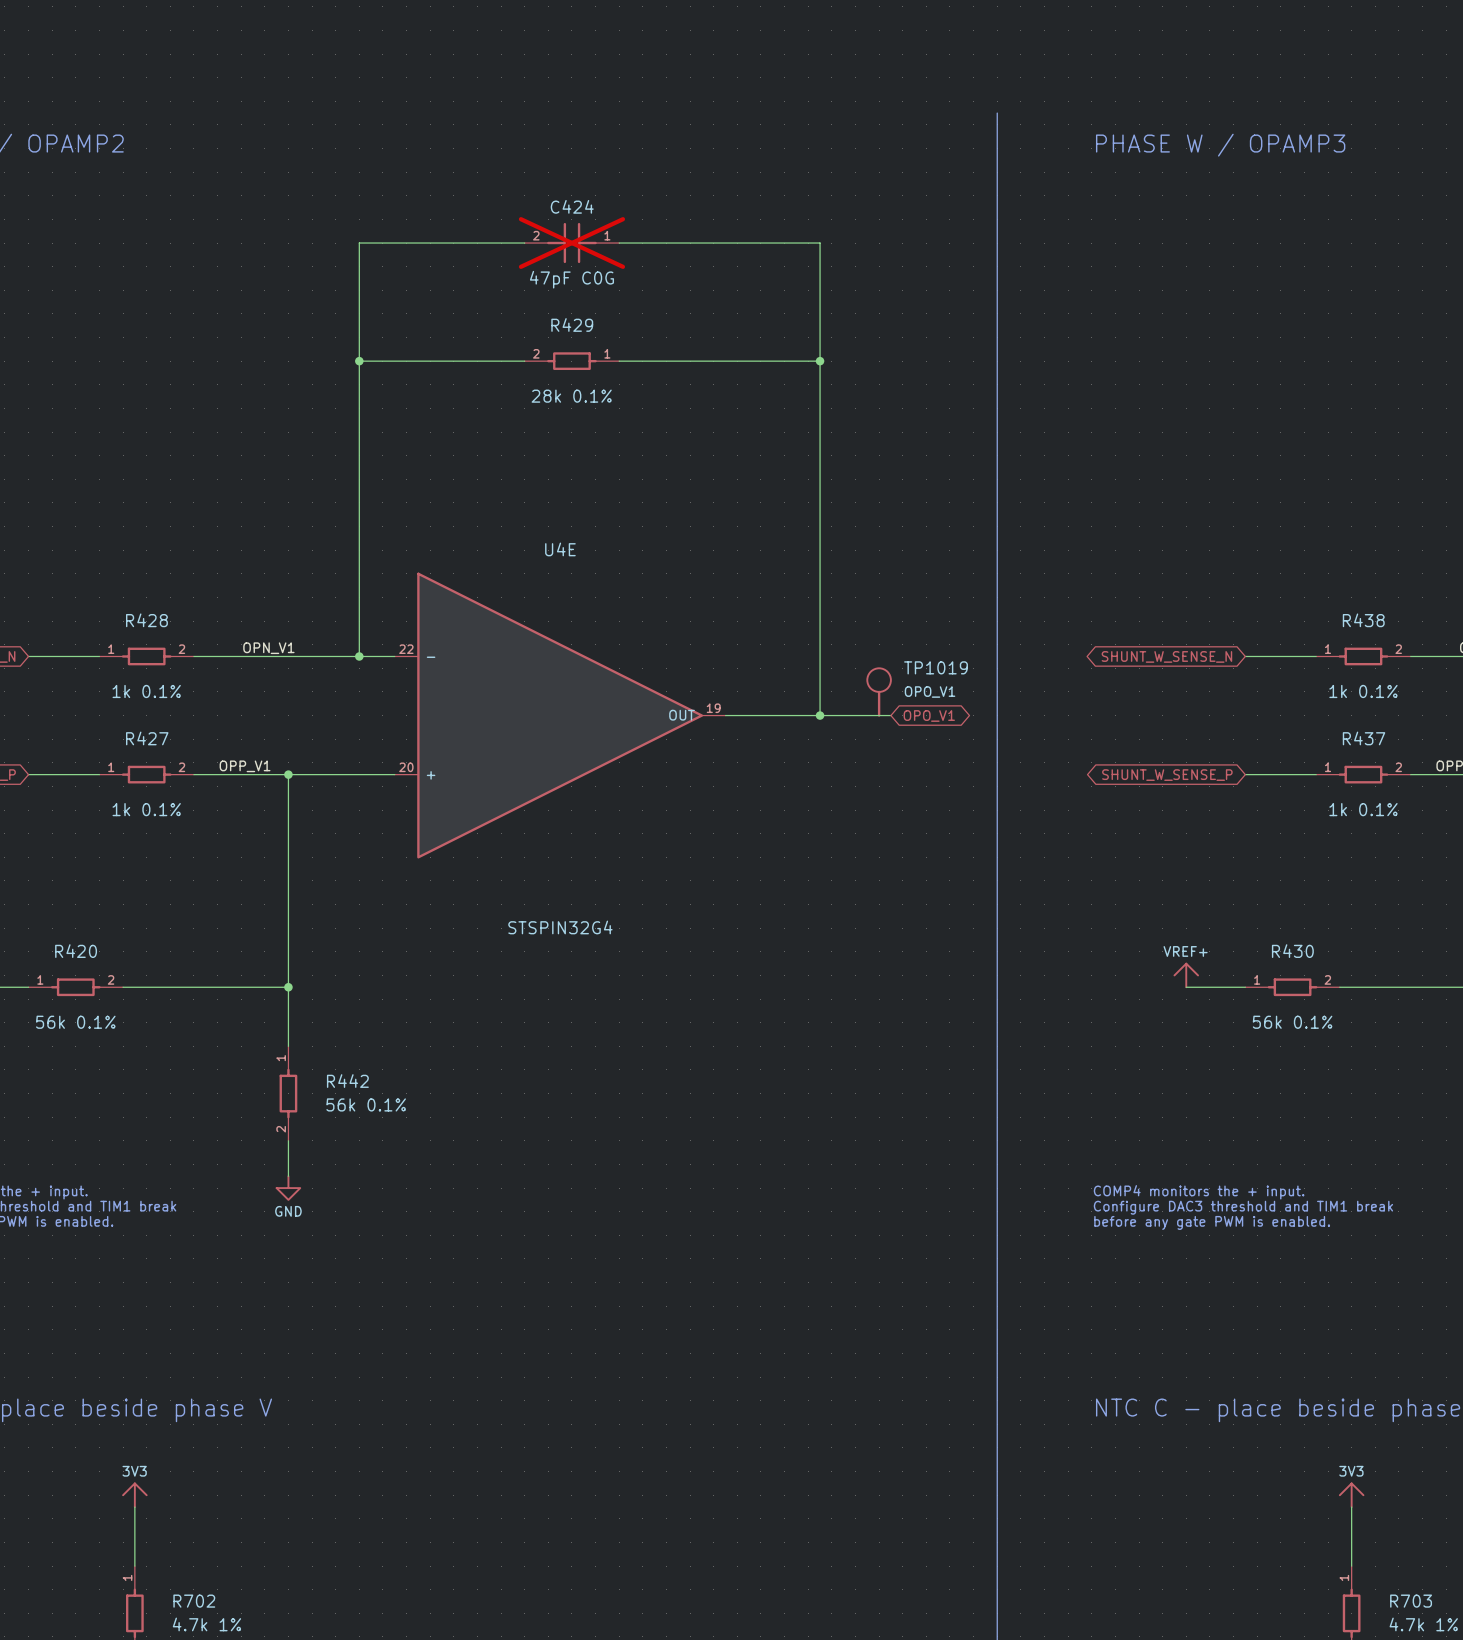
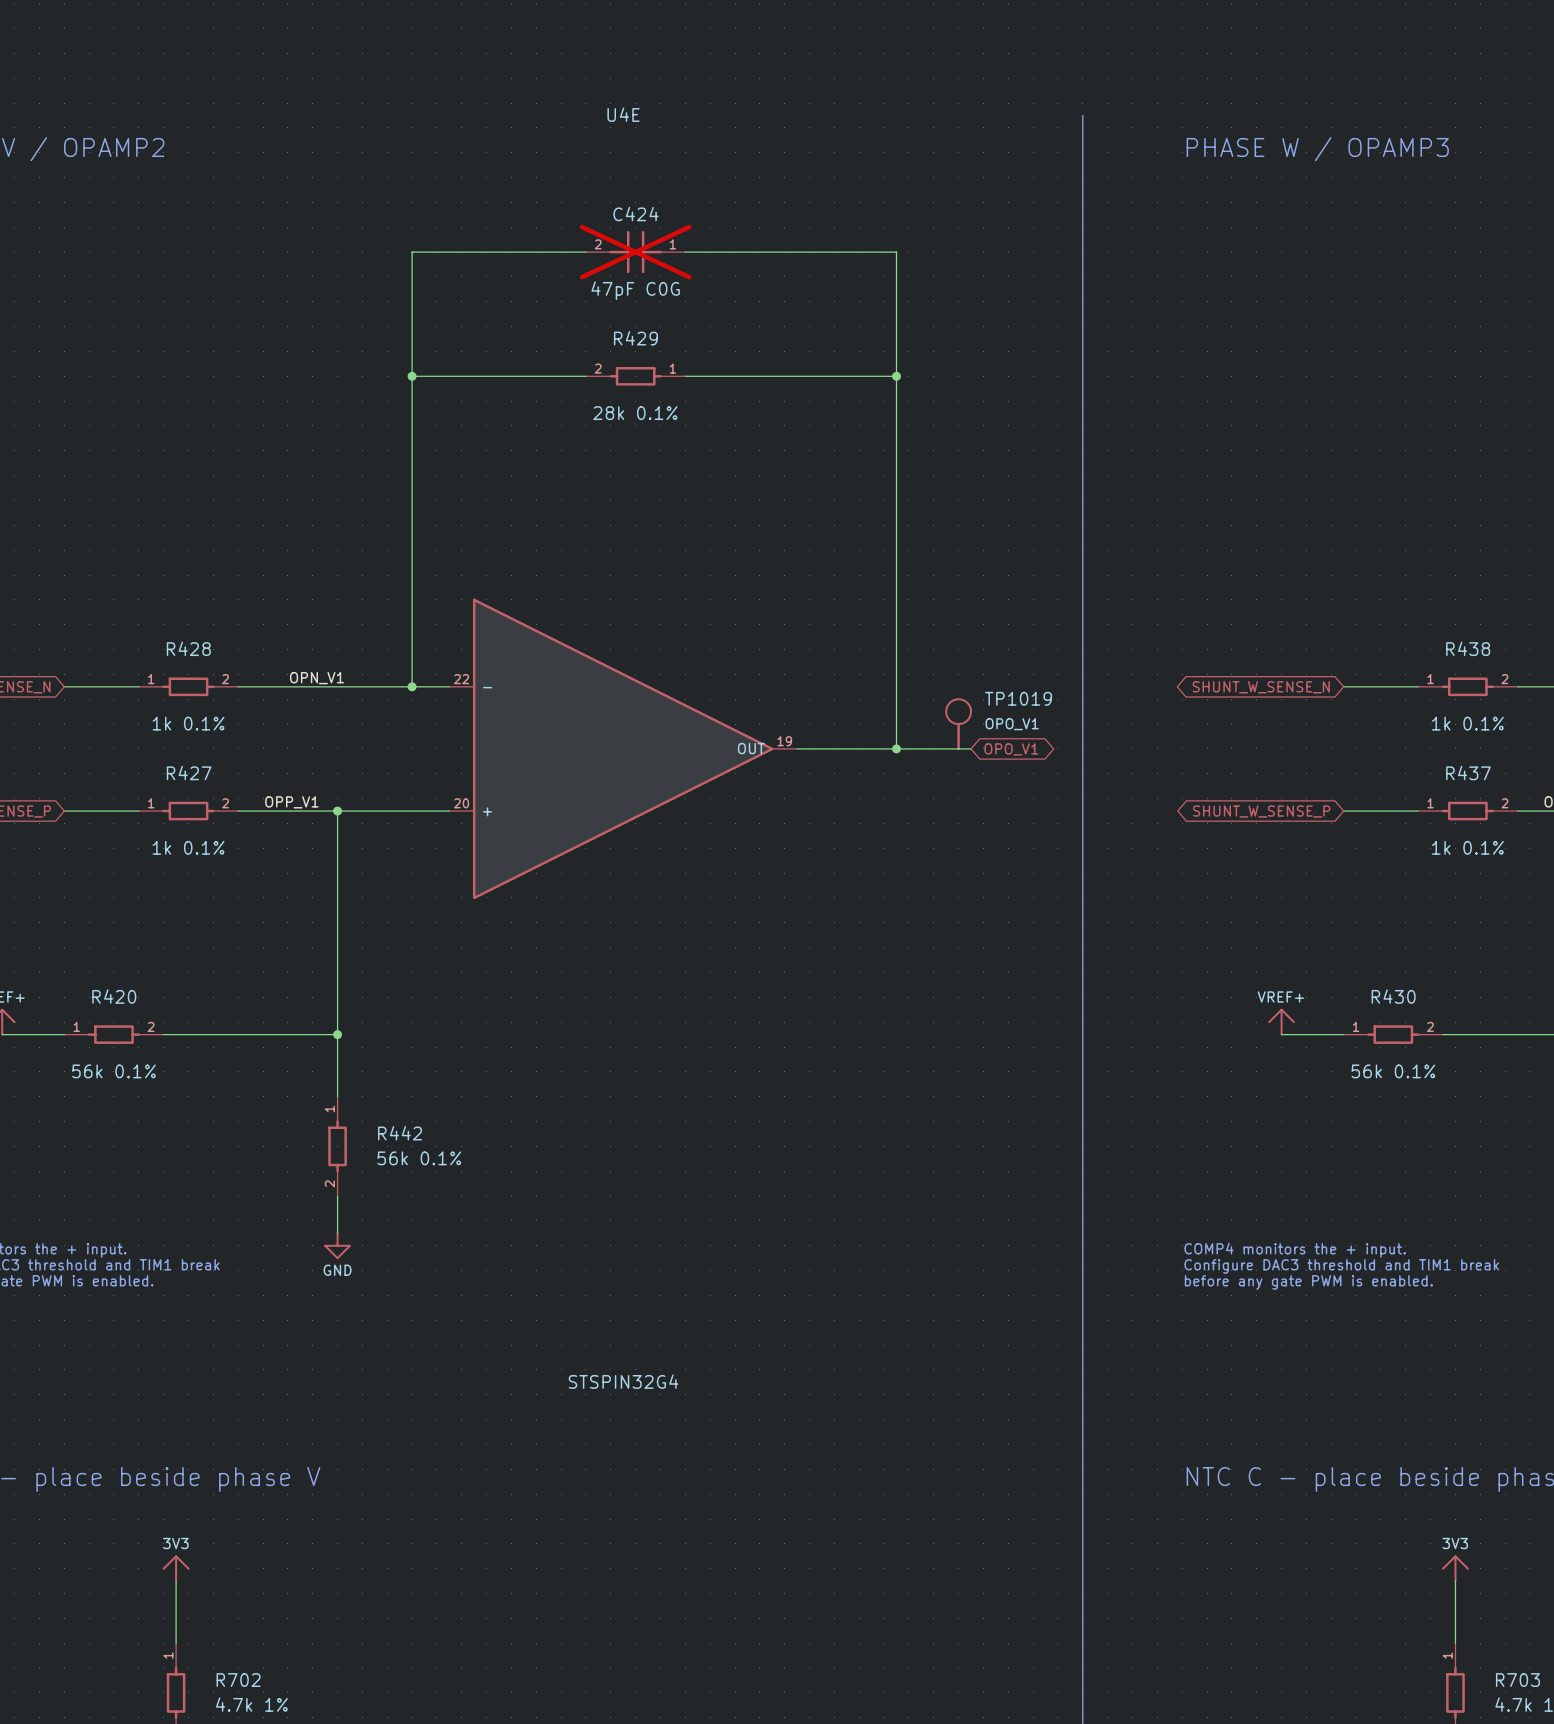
U4E name position: U4E (560, 549) -> U4E (623, 114)
U4E value position: STSPIN32G4 (560, 927) -> STSPIN32G4 (623, 1381)

